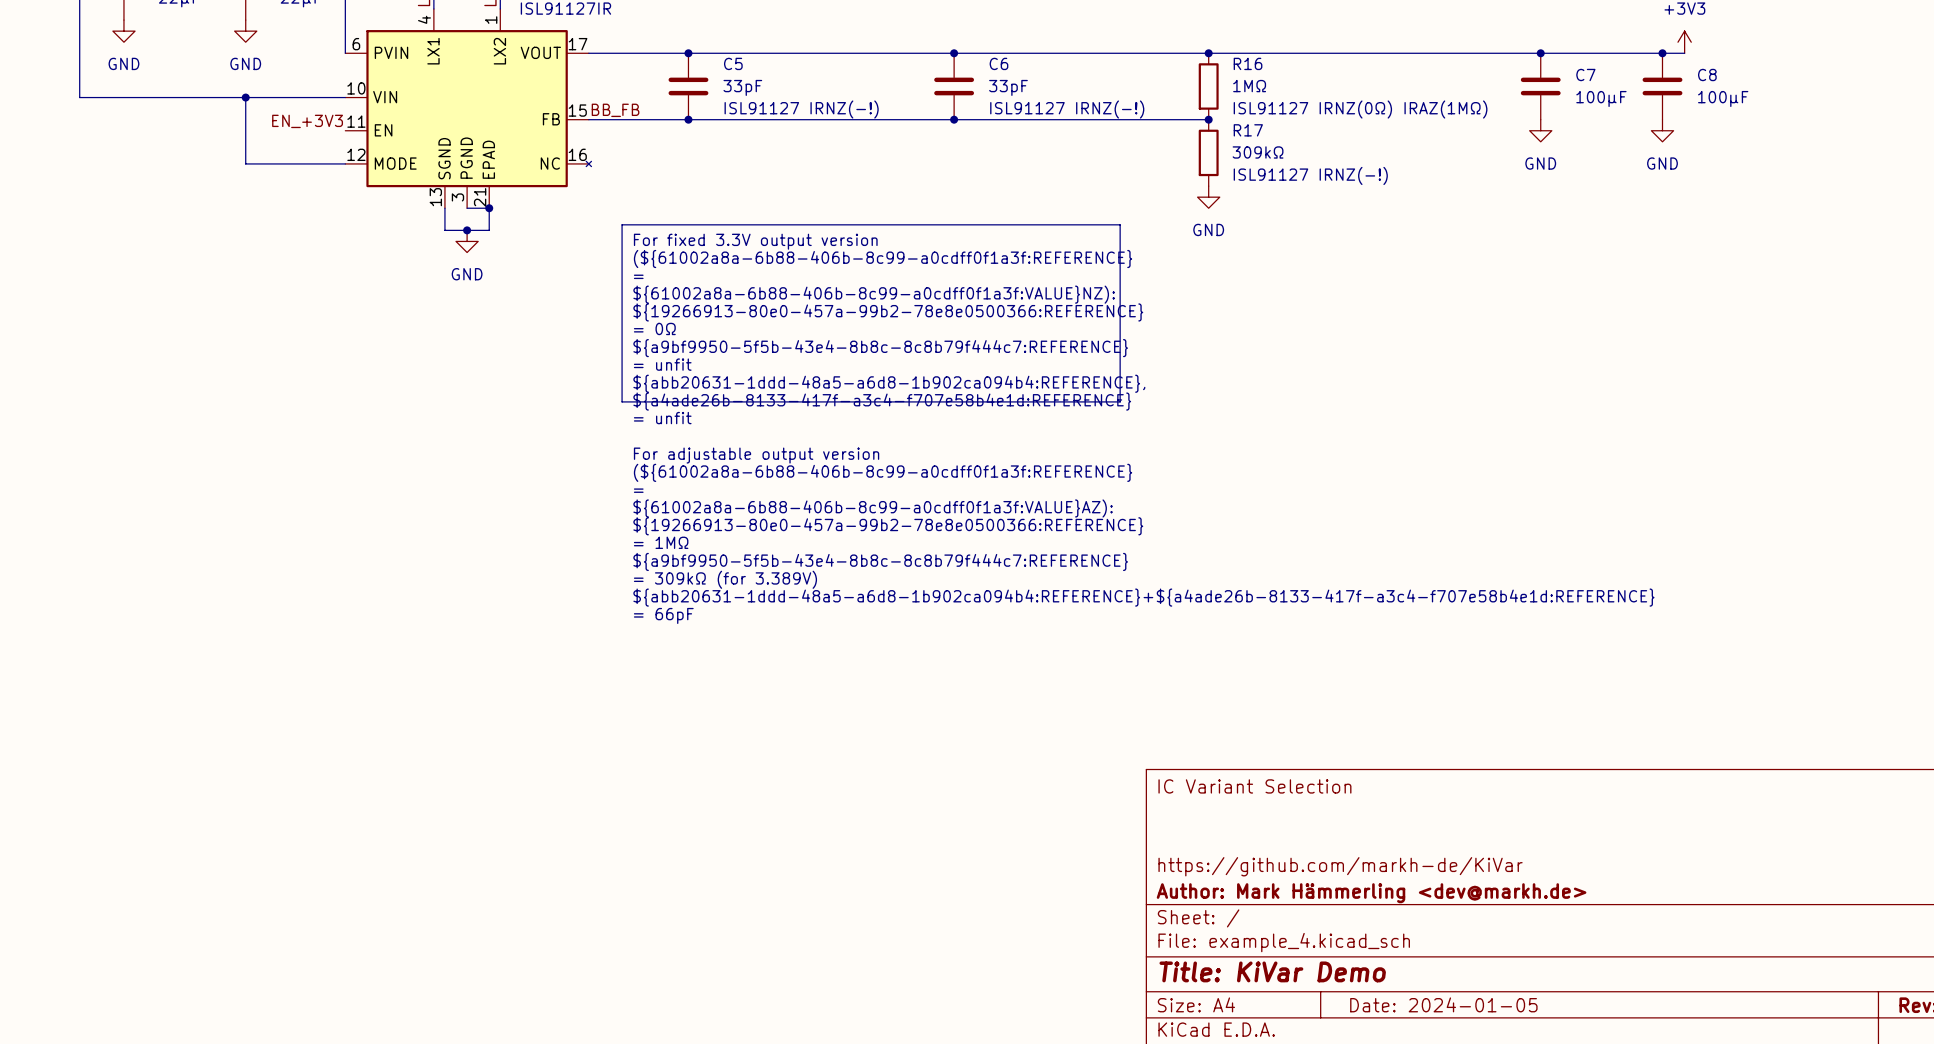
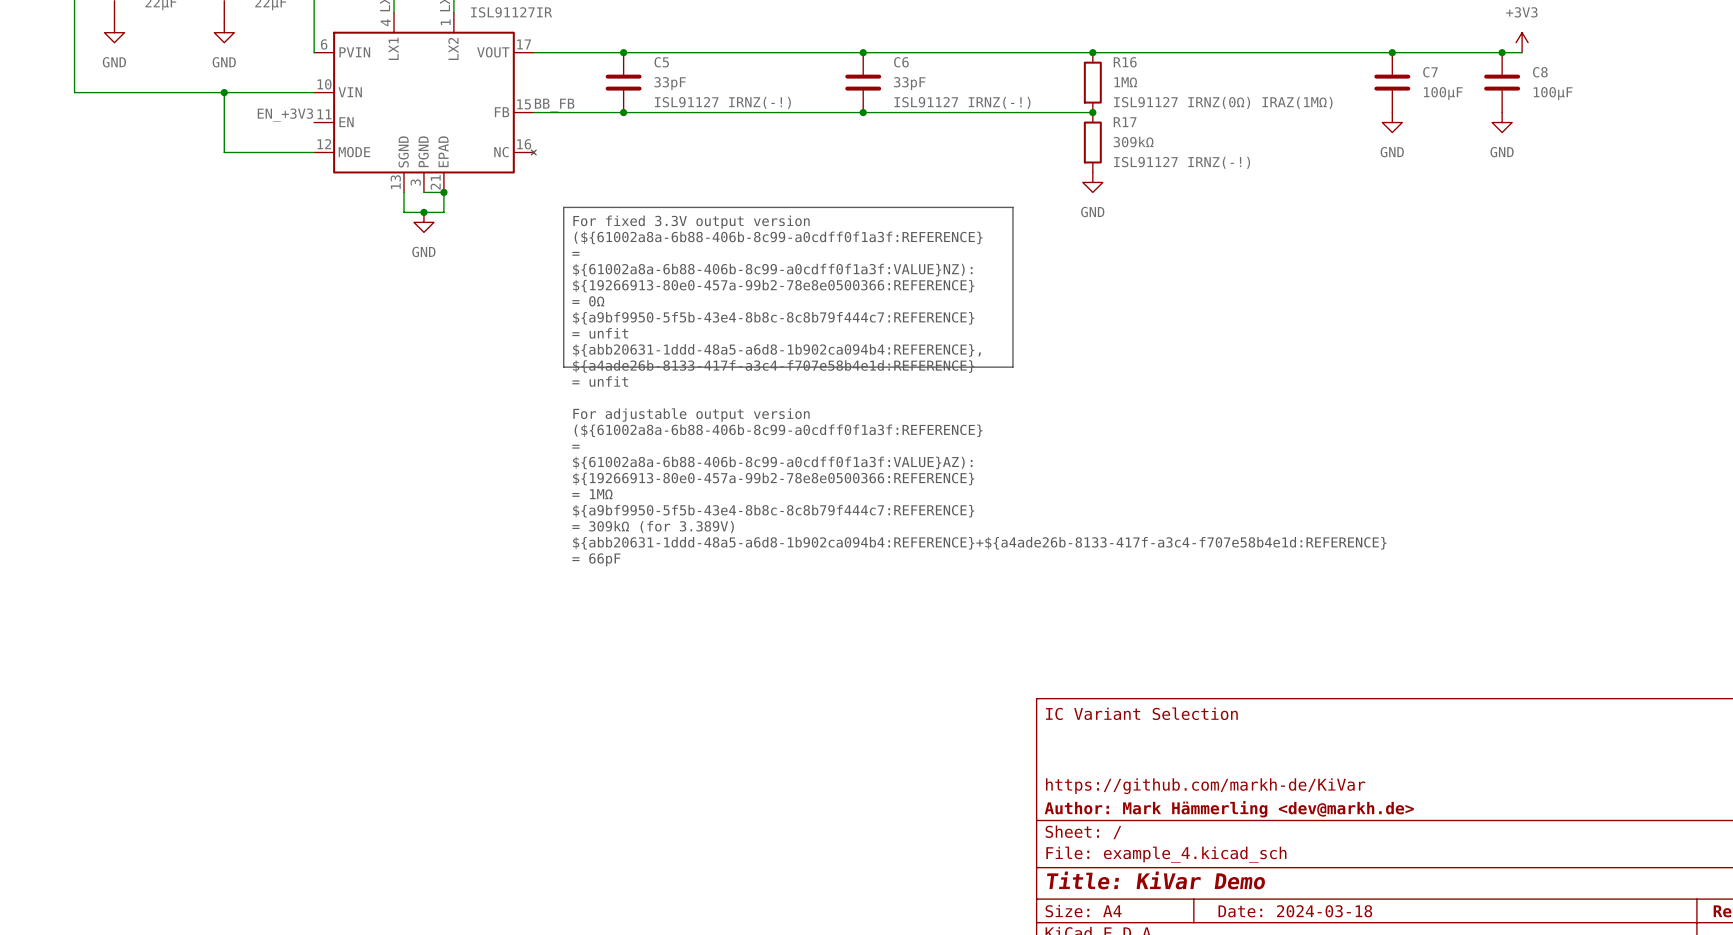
title block: Date: 2024-01-05 (1443, 1004) -> Date: 2024-03-18 (1295, 911)

